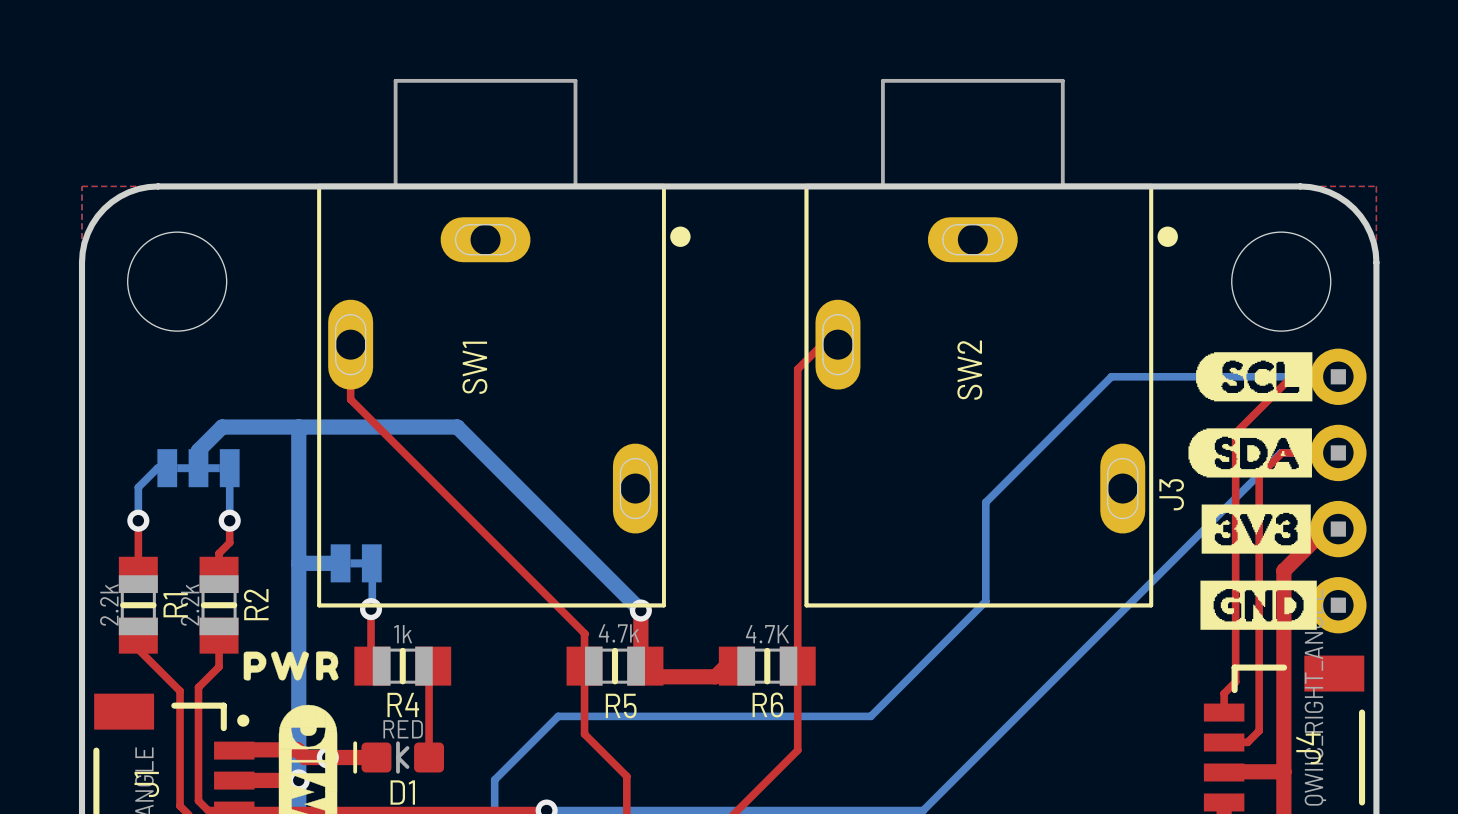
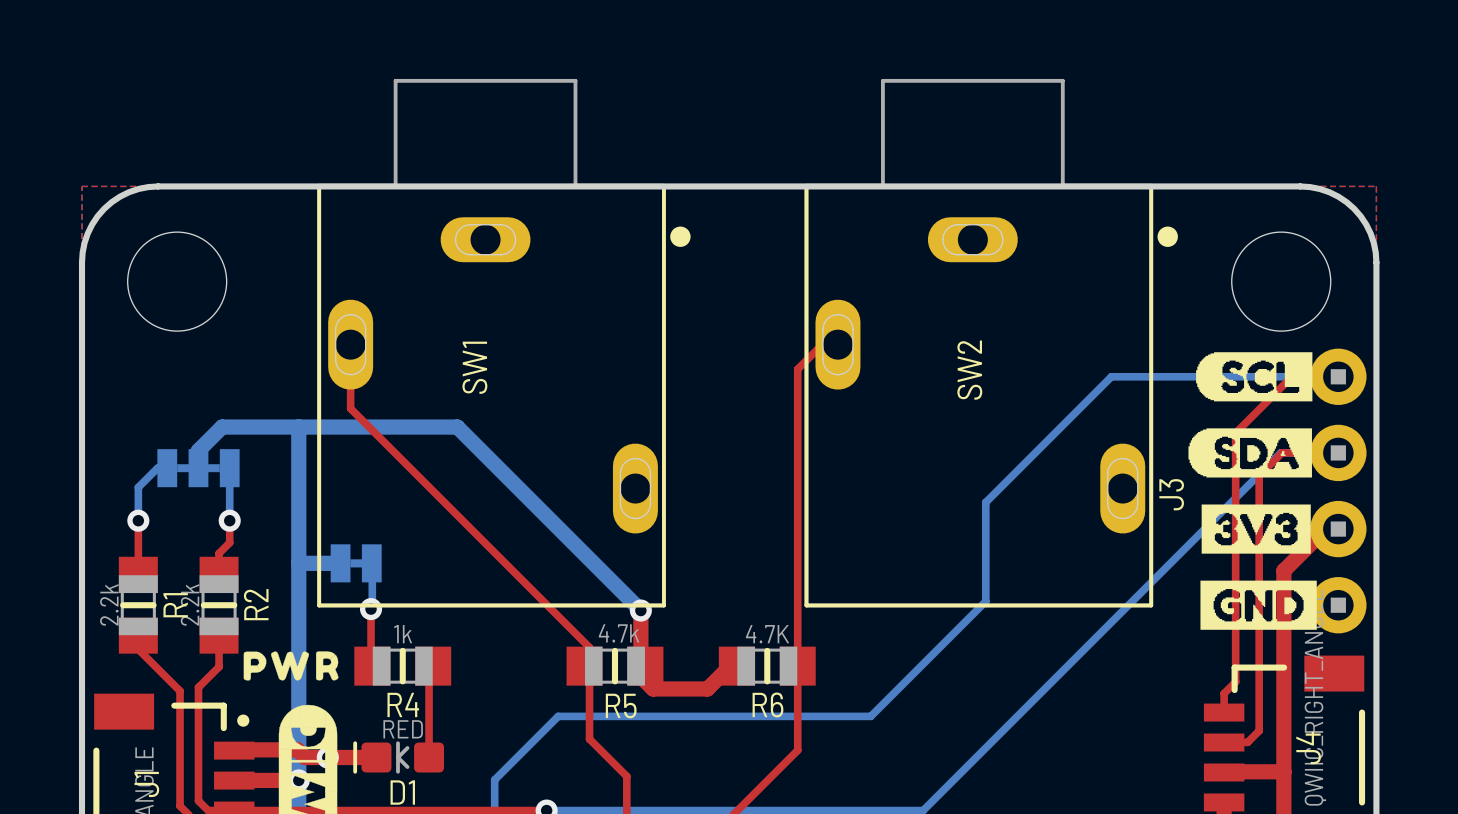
top track: (350, 399) (584, 633) -> (350, 399) (350, 408) (589, 647) (589, 739)
top track: (584, 634) (584, 734) (589, 739) -> none
top track: (640, 661) (654, 676) (715, 676) (726, 666) (730, 666) -> (640, 666) (640, 676) (653, 688) (707, 688) (730, 666)

